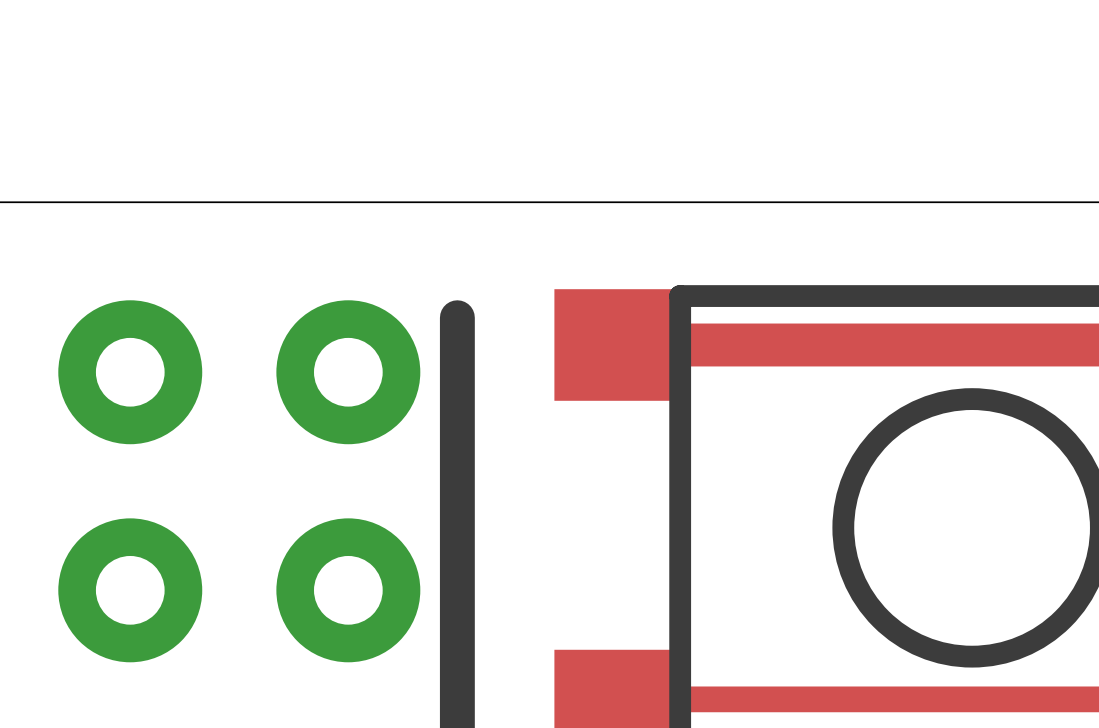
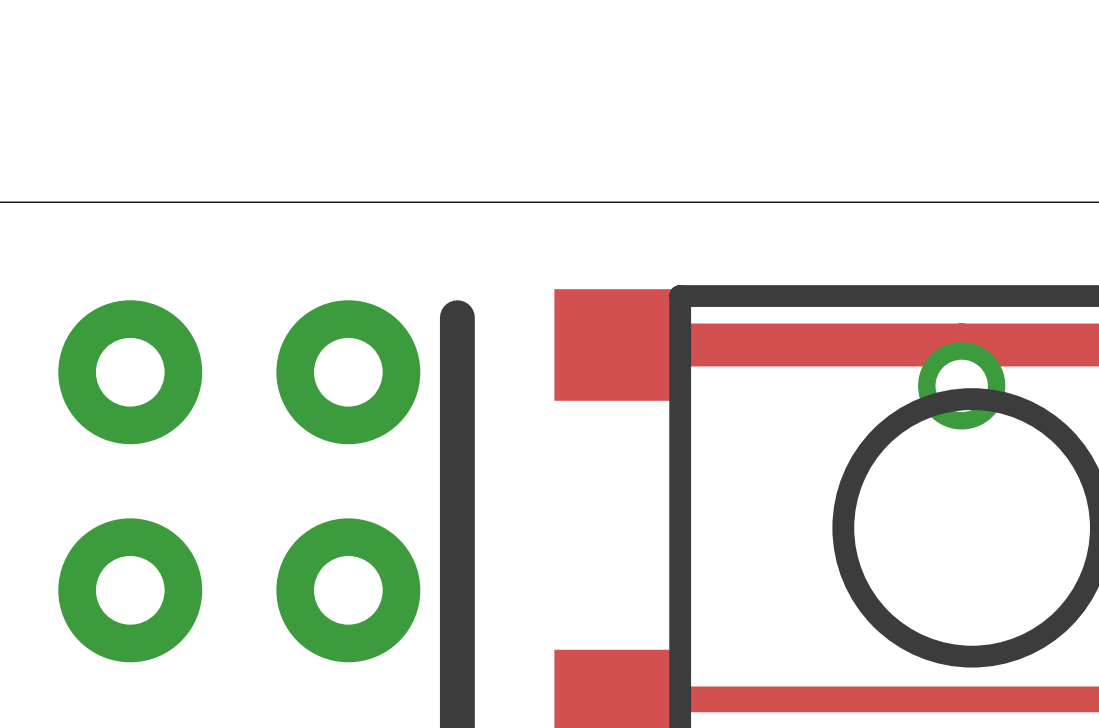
via: none -> (961, 385)

